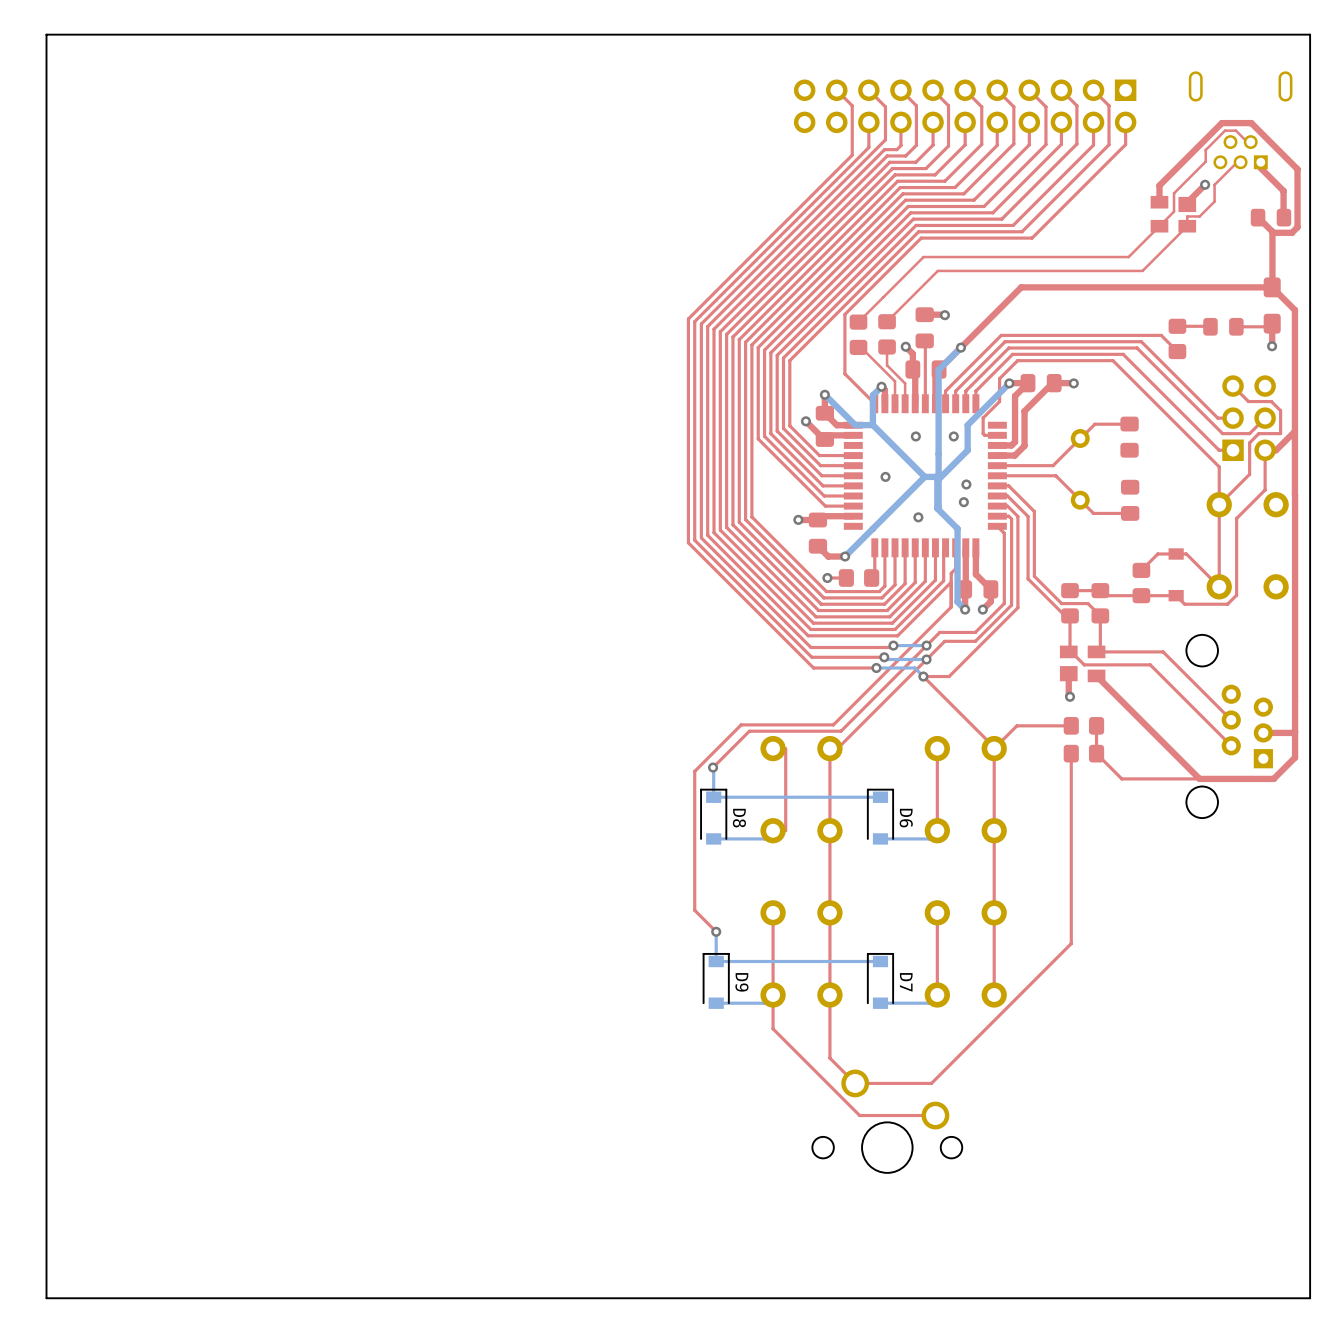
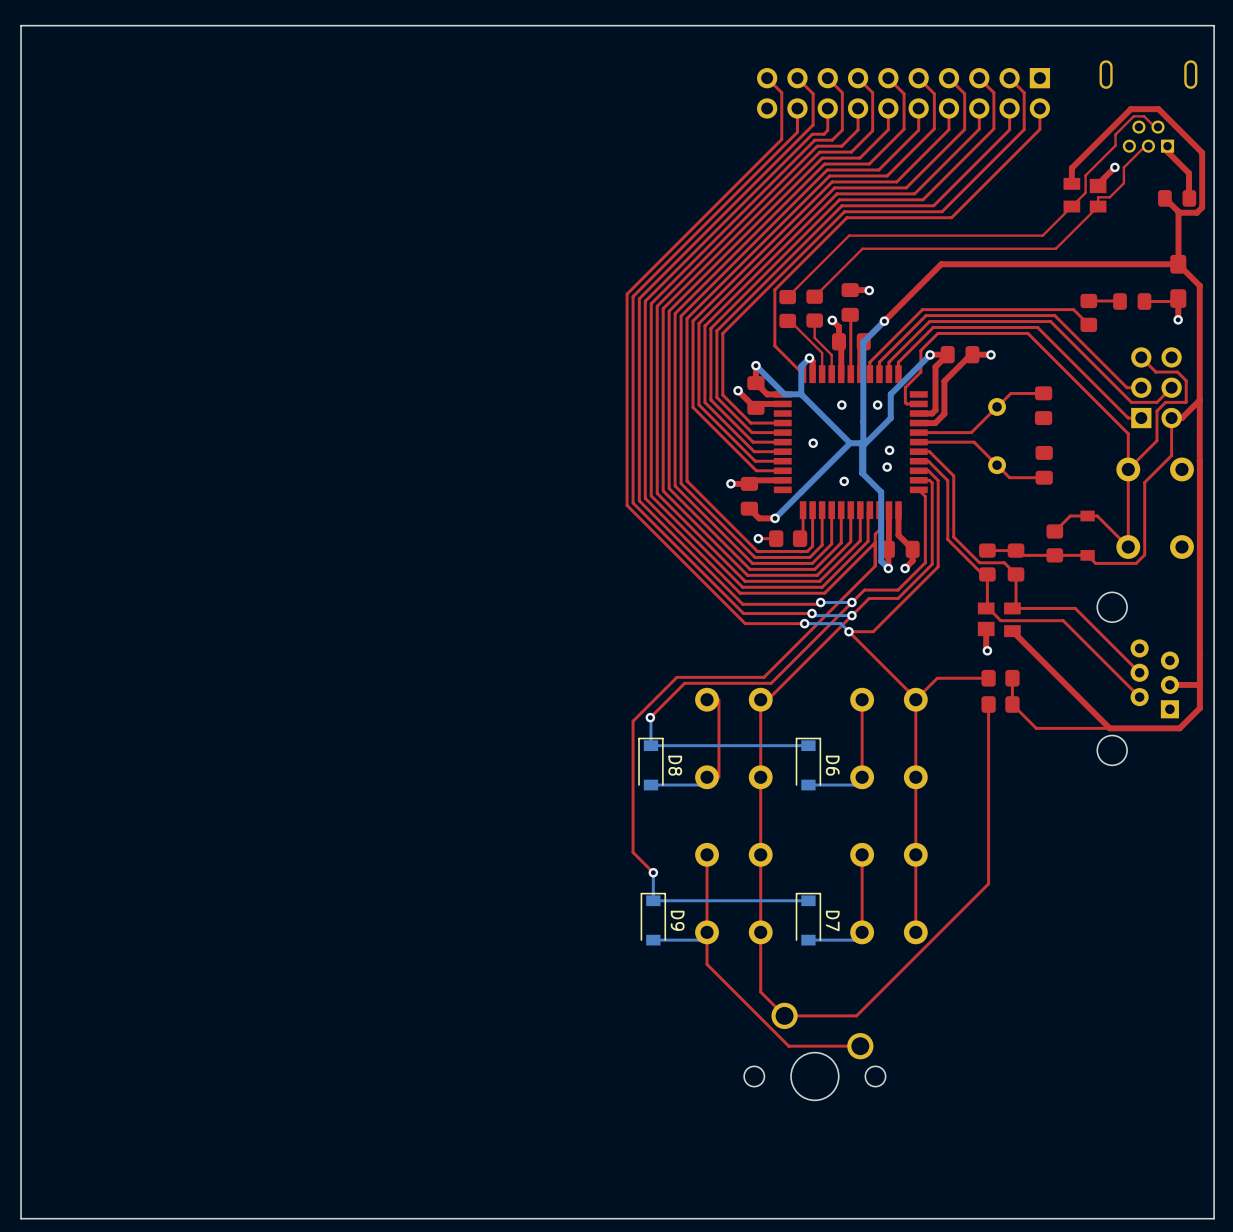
part: (965, 106) -> none

